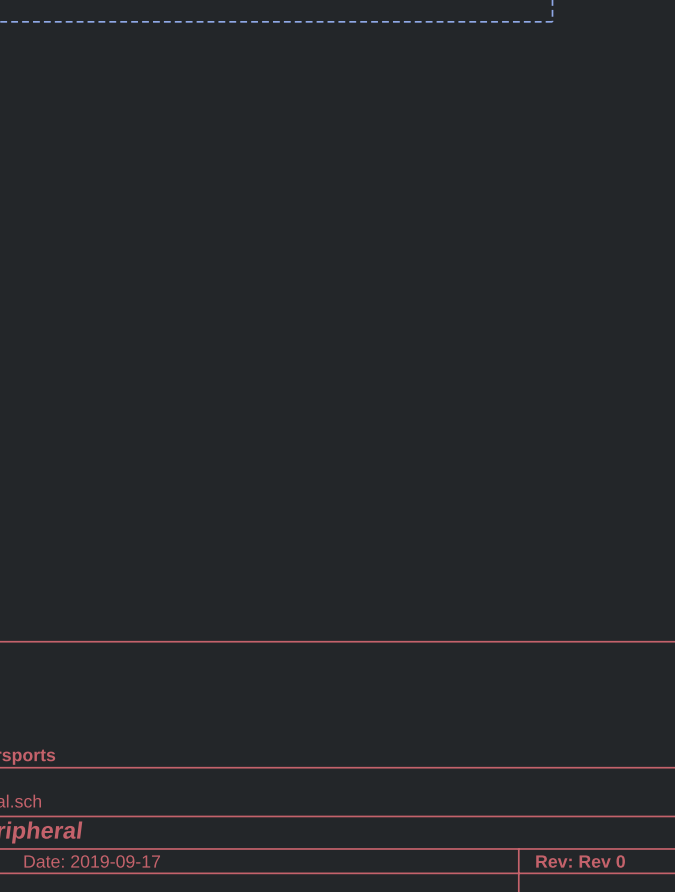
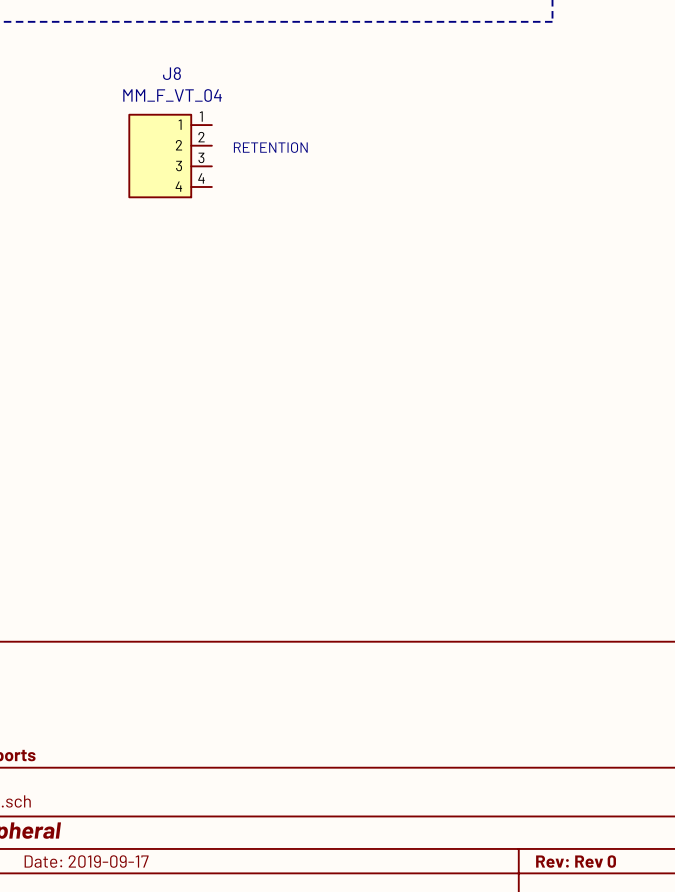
text: none -> RETENTION (270, 147)
J8: none -> MM_F_VT_04 (170, 156)

